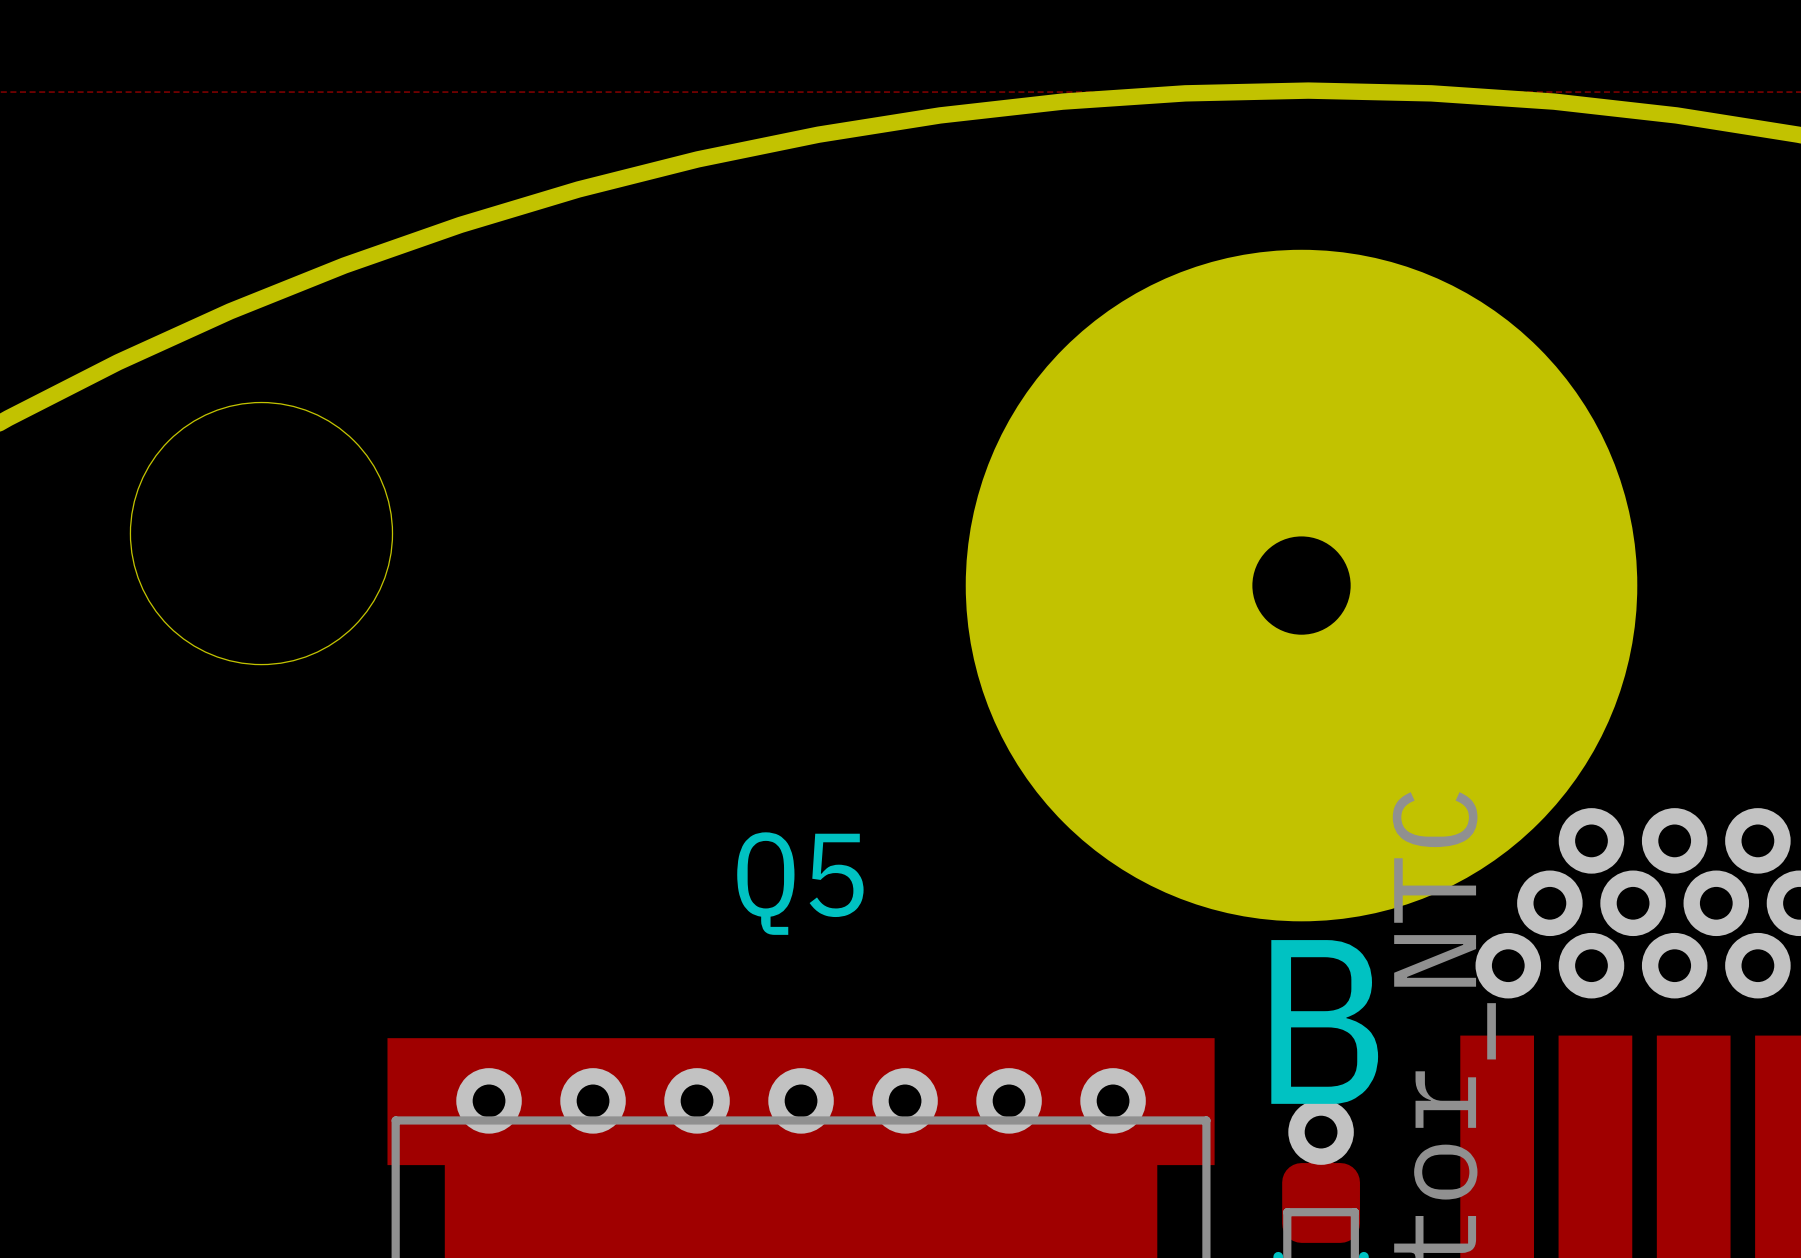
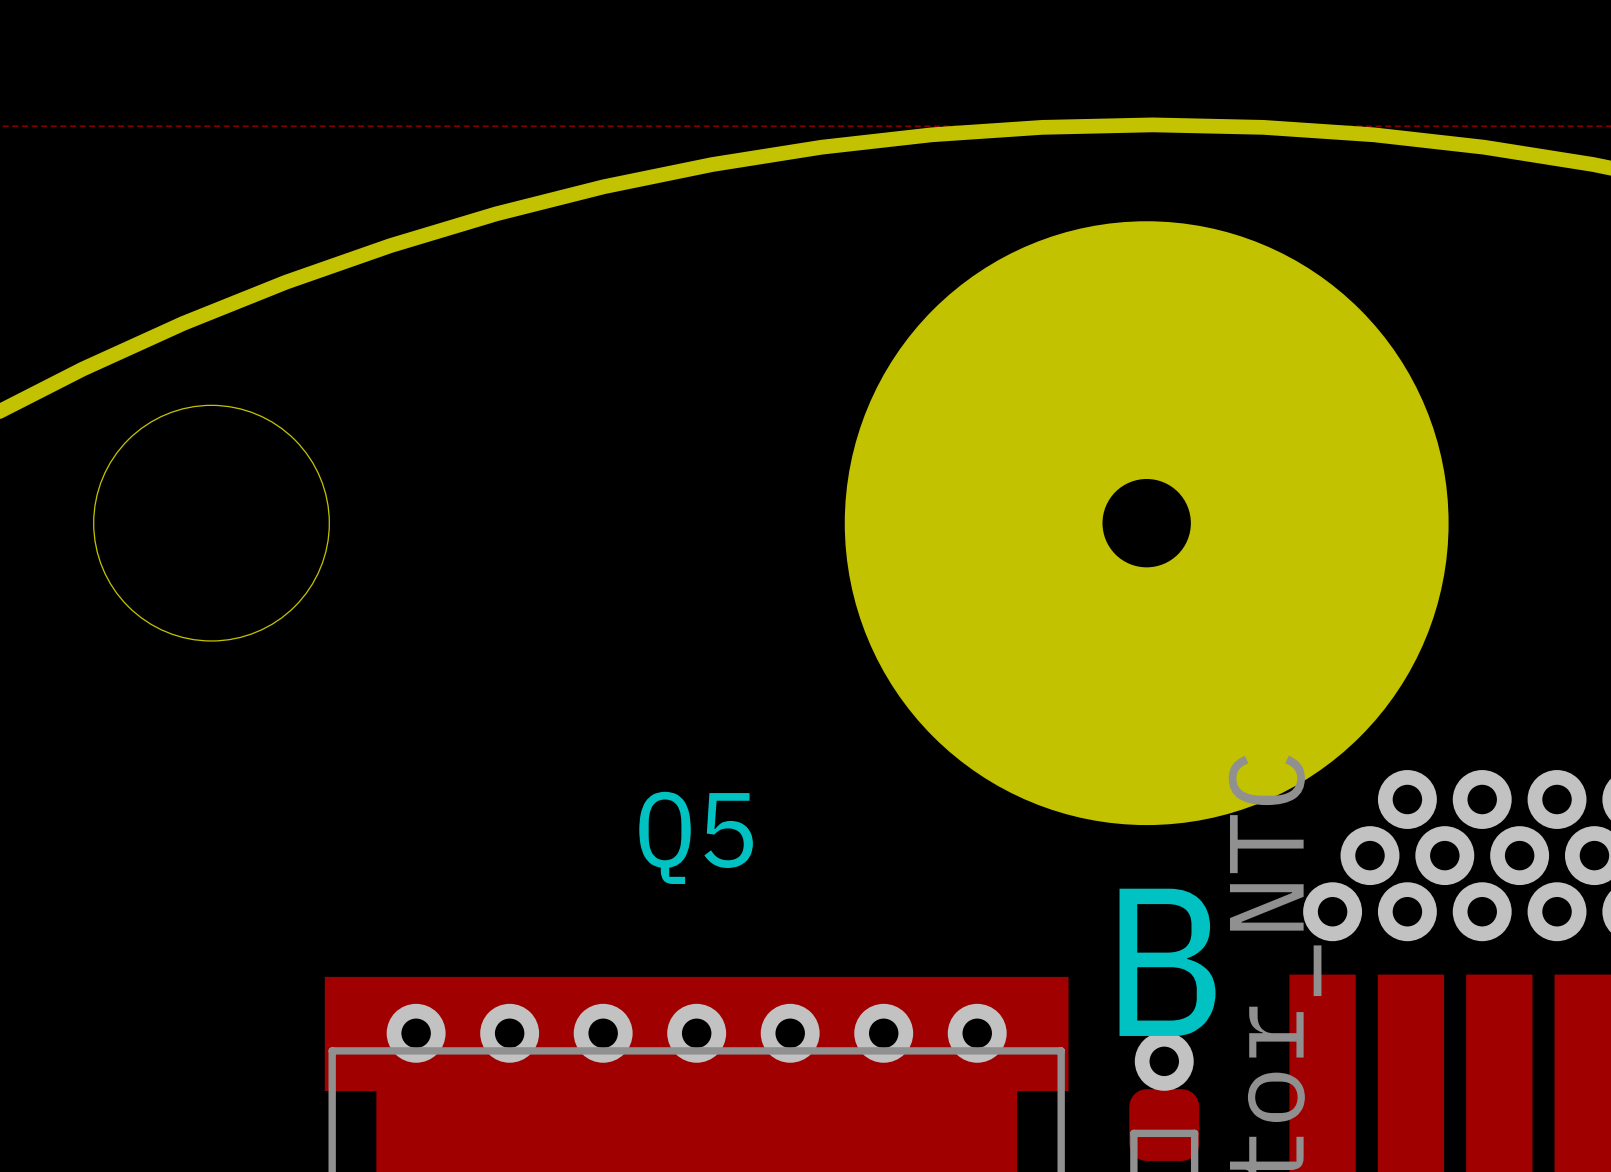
part position: (1301, 585) -> (1146, 523)

